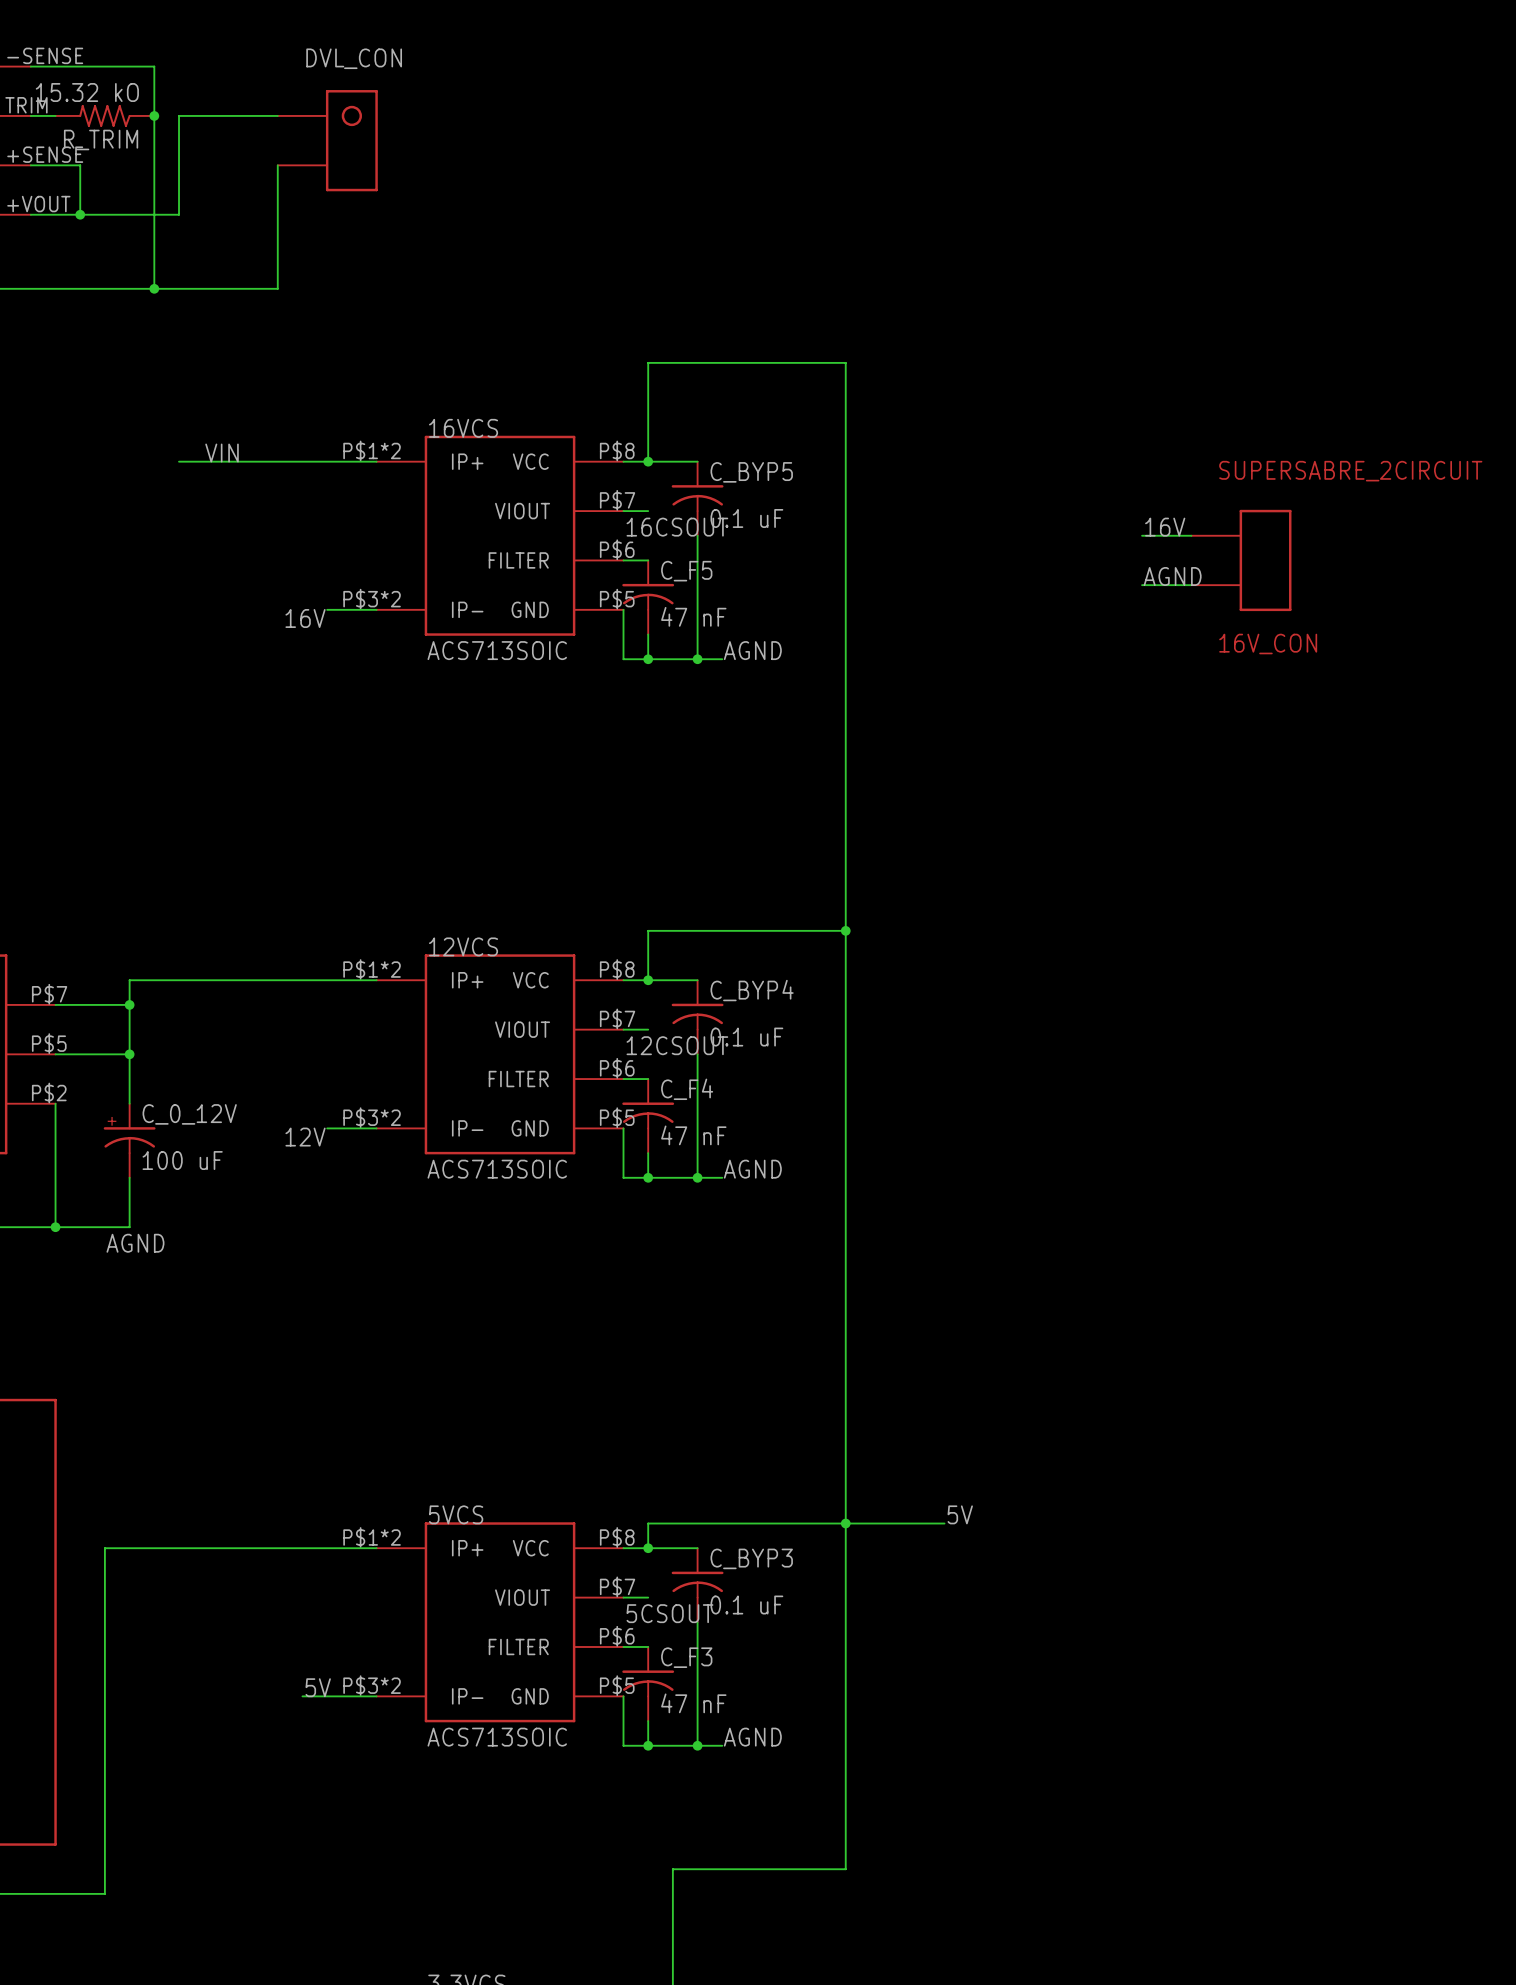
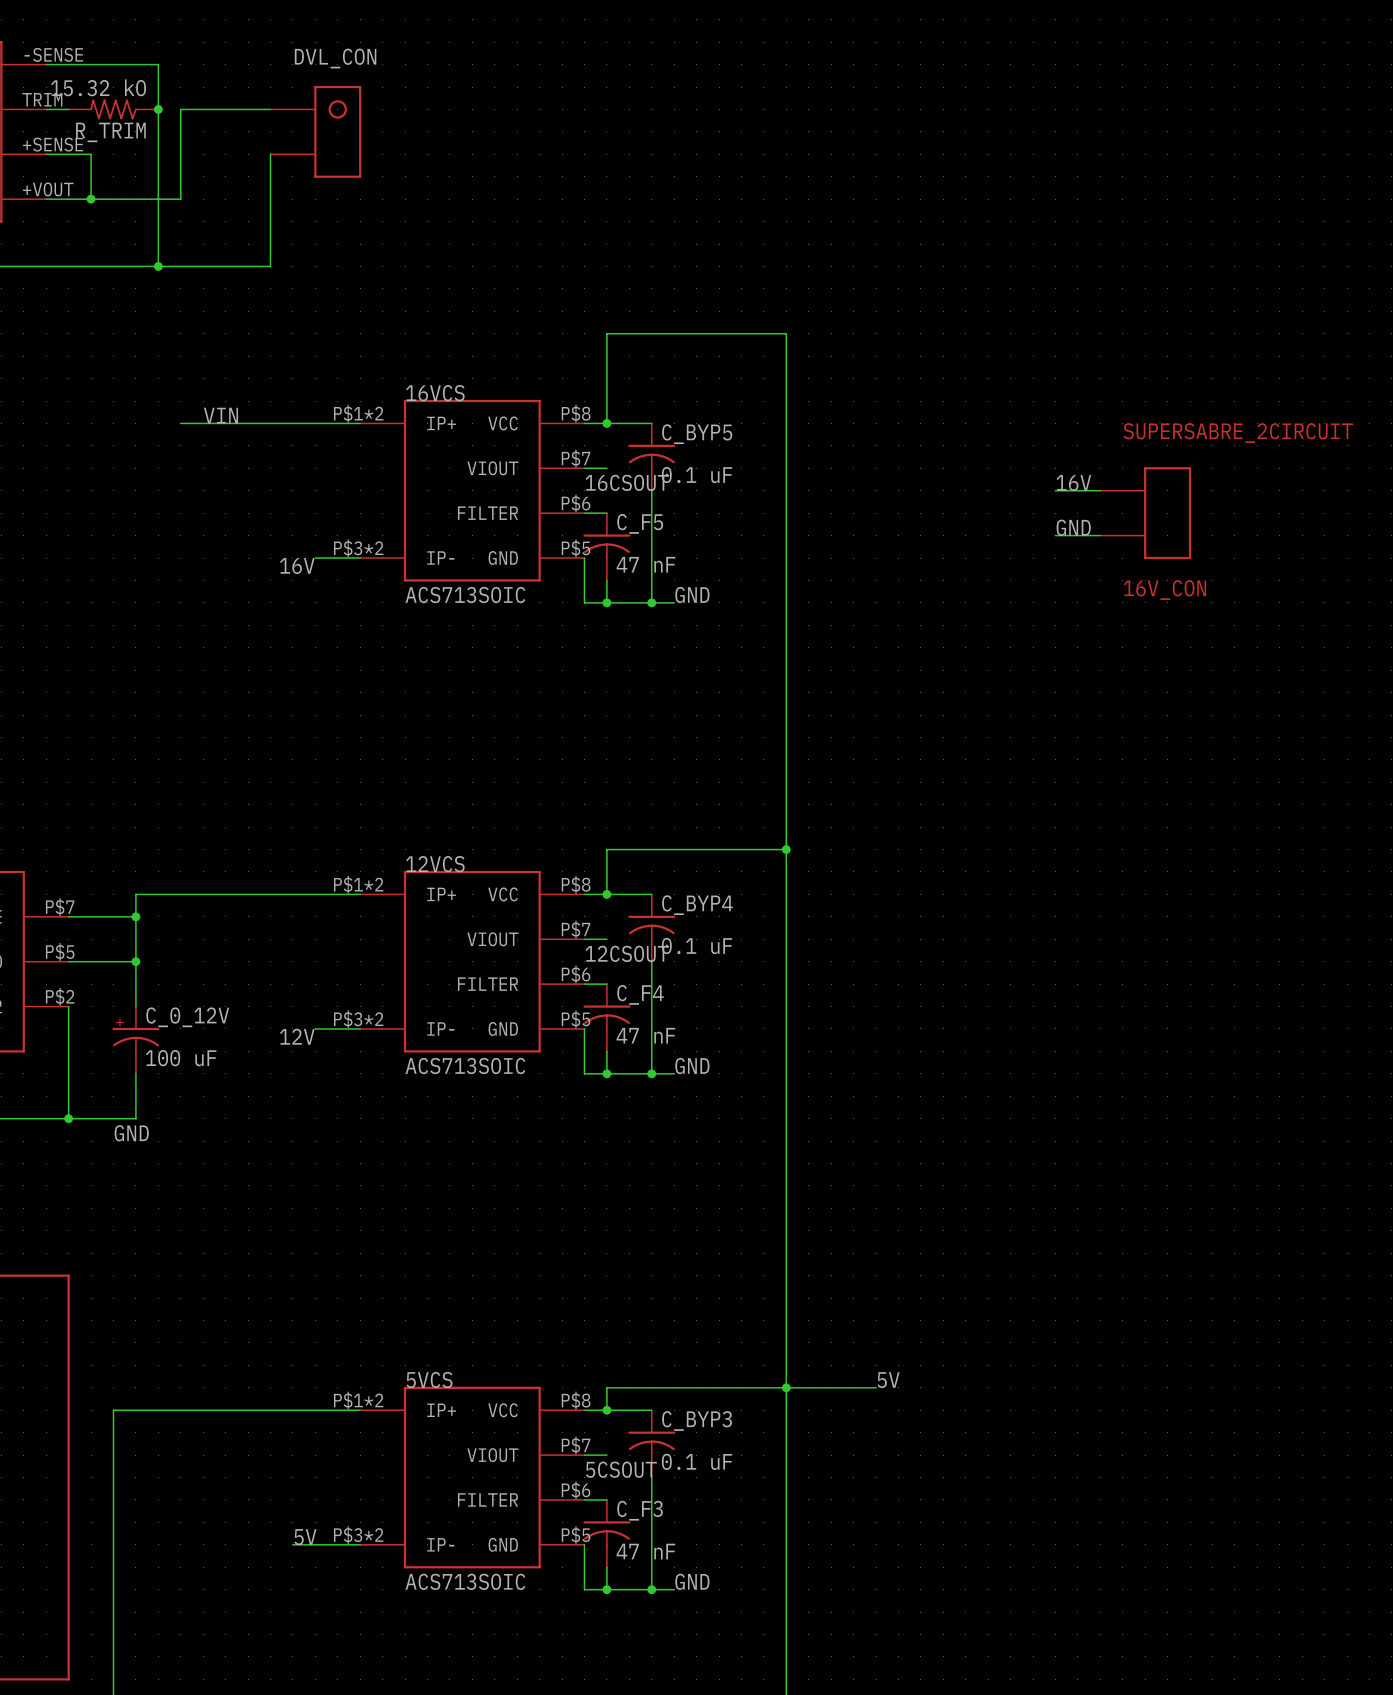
label: AGND (1172, 576) -> GND (1073, 527)
label: AGND (752, 650) -> GND (692, 595)
label: AGND (752, 1169) -> GND (692, 1065)
label: AGND (135, 1243) -> GND (131, 1133)
label: AGND (752, 1737) -> GND (692, 1581)

